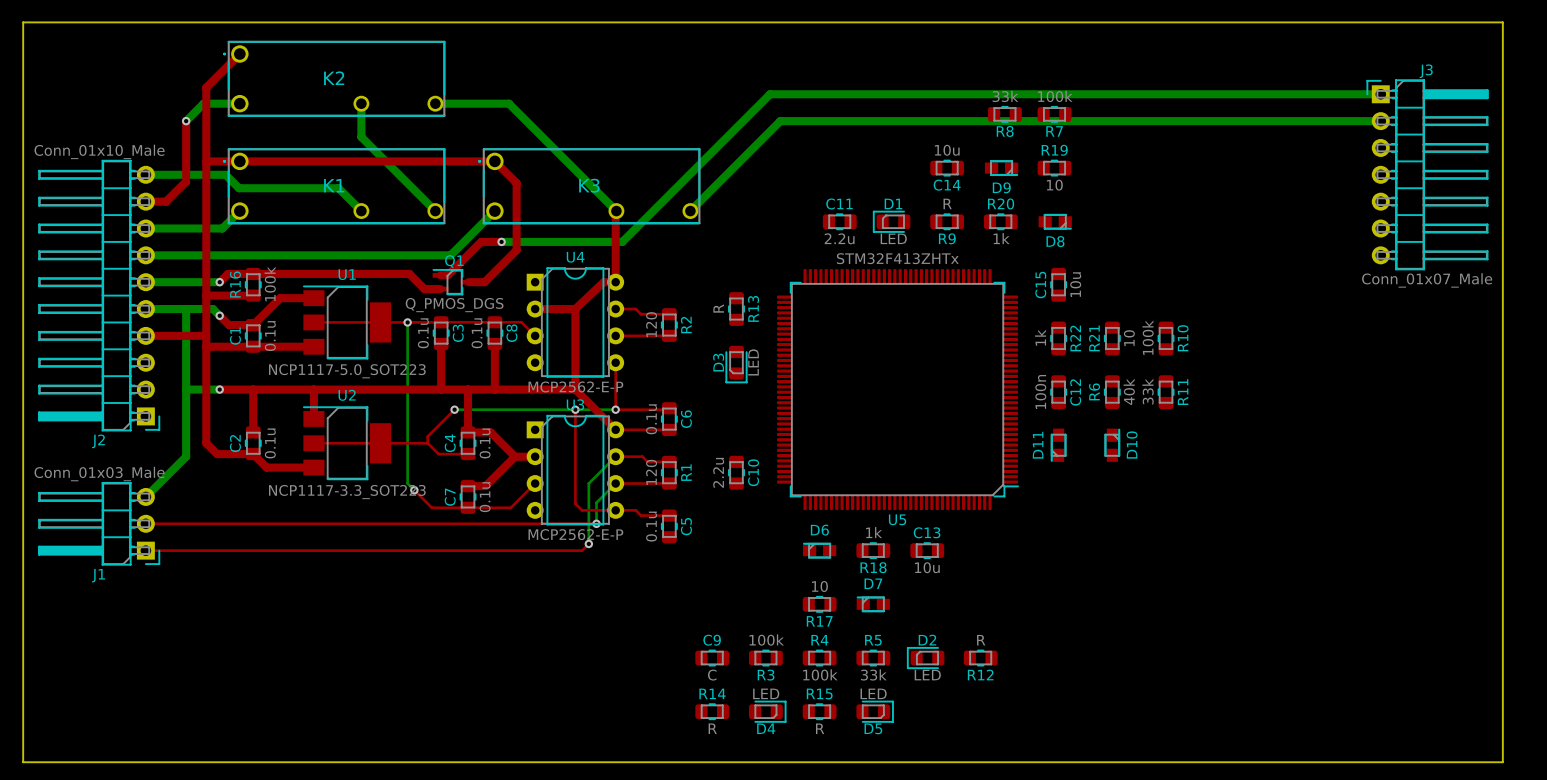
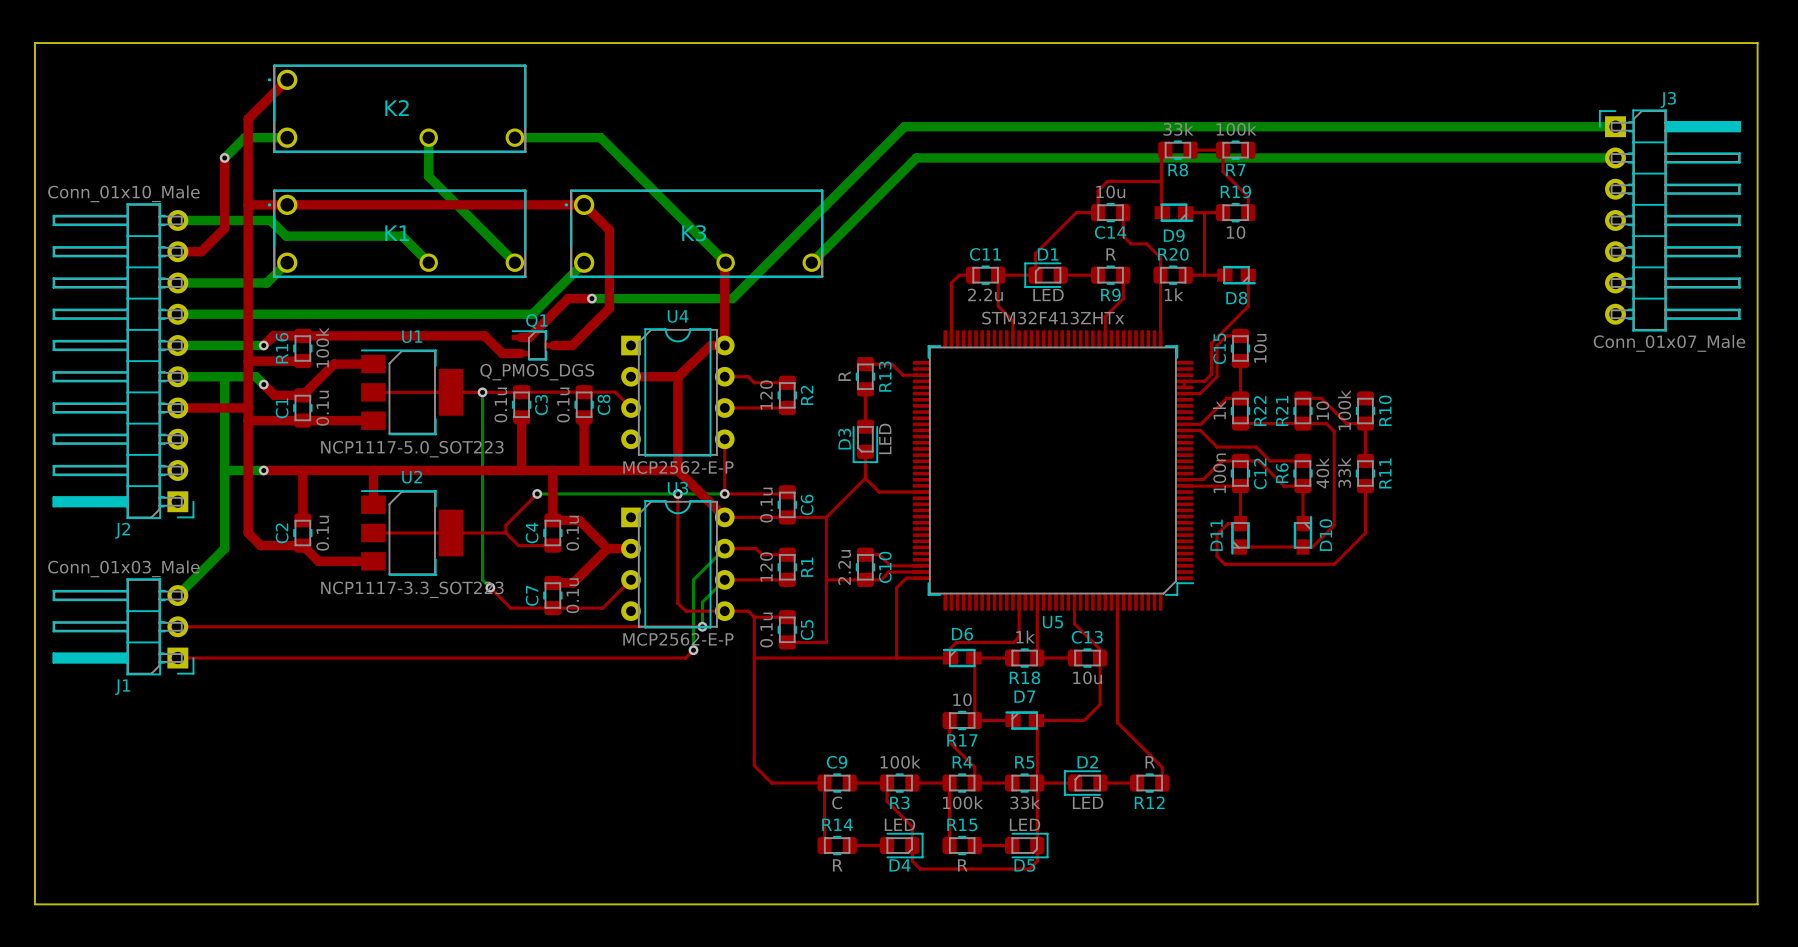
top track: none -> (1161, 150) (1162, 212)
top track: none -> (1186, 150) (1223, 150) (1223, 171) (1248, 197) (1248, 212)
top track: none -> (1161, 181) (1107, 181) (1098, 191) (1098, 212) (1076, 212) (1035, 253) (1035, 275) (998, 275) (998, 306) (1012, 321) (1012, 339)
top track: none -> (1123, 212) (1123, 236) (1131, 243) (1146, 243) (1160, 257) (1160, 339)
top track: none -> (1185, 212) (1223, 212)
top track: none -> (1204, 212) (1204, 275)
top track: none -> (973, 275) (959, 275) (951, 282) (951, 339)
top track: none -> (1060, 275) (1098, 275)
top track: none -> (1123, 275) (1123, 298) (1105, 316) (1105, 339)
top track: none -> (1185, 275) (1224, 275)
top track: none -> (1248, 275) (1248, 306)
top track: none -> (1248, 306) (1211, 343) (1211, 374) (1204, 381) (1184, 381) (1184, 387)
top track: none -> (1240, 335) (1226, 335) (1217, 345) (1217, 376) (1200, 393) (1184, 393)
top track: none -> (1240, 361) (1240, 398) (1226, 398) (1200, 424) (1184, 424)
top track: none -> (865, 364) (891, 364) (902, 375) (921, 375)
top track: none -> (865, 389) (865, 426)
top track: none -> (1302, 398) (1321, 398) (1346, 423) (1365, 423) (1365, 460)
top track: none -> (1240, 423) (1326, 423) (1334, 431) (1334, 525) (1312, 547) (1240, 547)
top track: none -> (1184, 430) (1200, 430) (1217, 447) (1256, 447) (1269, 460) (1302, 460)
top track: none -> (865, 451) (865, 478)
top track: none -> (865, 478) (826, 517)
top track: none -> (865, 478) (879, 492) (921, 492)
top track: none -> (1184, 479) (1203, 479) (1221, 460) (1258, 460) (1284, 486) (1302, 486) (1302, 523)
top track: none -> (1184, 485) (1240, 486) (1240, 523) (1227, 523) (1217, 534) (1217, 556) (1224, 564) (1334, 564) (1365, 533) (1365, 486)
top track: none -> (787, 517) (826, 517)
top track: none -> (826, 517) (826, 642) (787, 642)
top track: none -> (865, 554) (879, 554) (890, 565) (921, 565)
top track: none -> (921, 572) (888, 572) (881, 579) (826, 579)
top track: none -> (921, 578) (906, 578) (896, 587) (896, 658)
top track: none -> (1019, 601) (1019, 637) (1013, 642) (956, 642) (950, 648) (950, 658) (754, 658)
top track: none -> (1037, 601) (1037, 658) (1074, 658)
top track: none -> (1074, 601) (1074, 623) (1100, 649) (1100, 704) (1084, 720) (1036, 720) (1037, 861) (1029, 868) (920, 868) (912, 861) (912, 826) (887, 801) (887, 783) (849, 783)
top track: none -> (1117, 601) (1117, 722) (1162, 767) (1162, 783)
top track: none -> (754, 617) (754, 765) (771, 783) (824, 783) (824, 845)
top track: none -> (1012, 658) (973, 658) (974, 720) (1013, 720)
top track: none -> (949, 720) (949, 742) (974, 767) (974, 783) (1012, 783)
top track: none -> (912, 783) (949, 783) (949, 845)
top track: none -> (1037, 783) (1075, 783)
top track: none -> (1100, 783) (1137, 783)
top track: none -> (849, 845) (887, 845)
top track: none -> (974, 845) (1012, 845)

